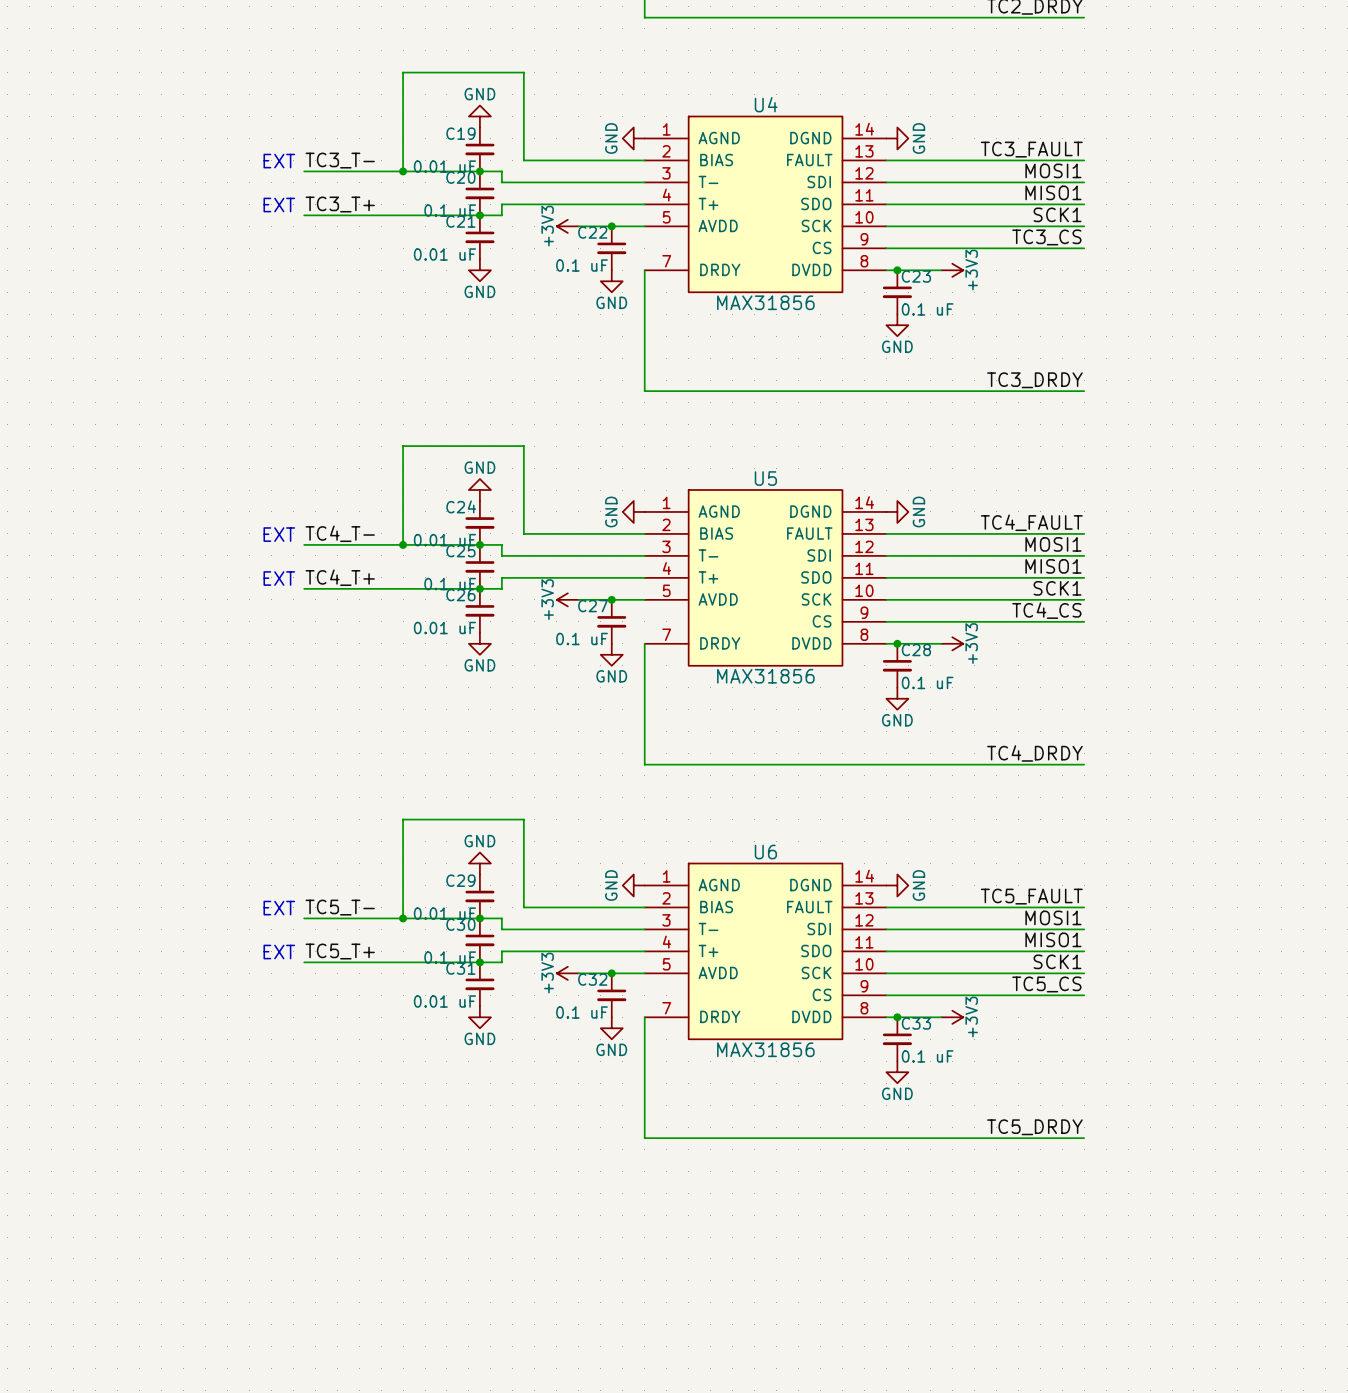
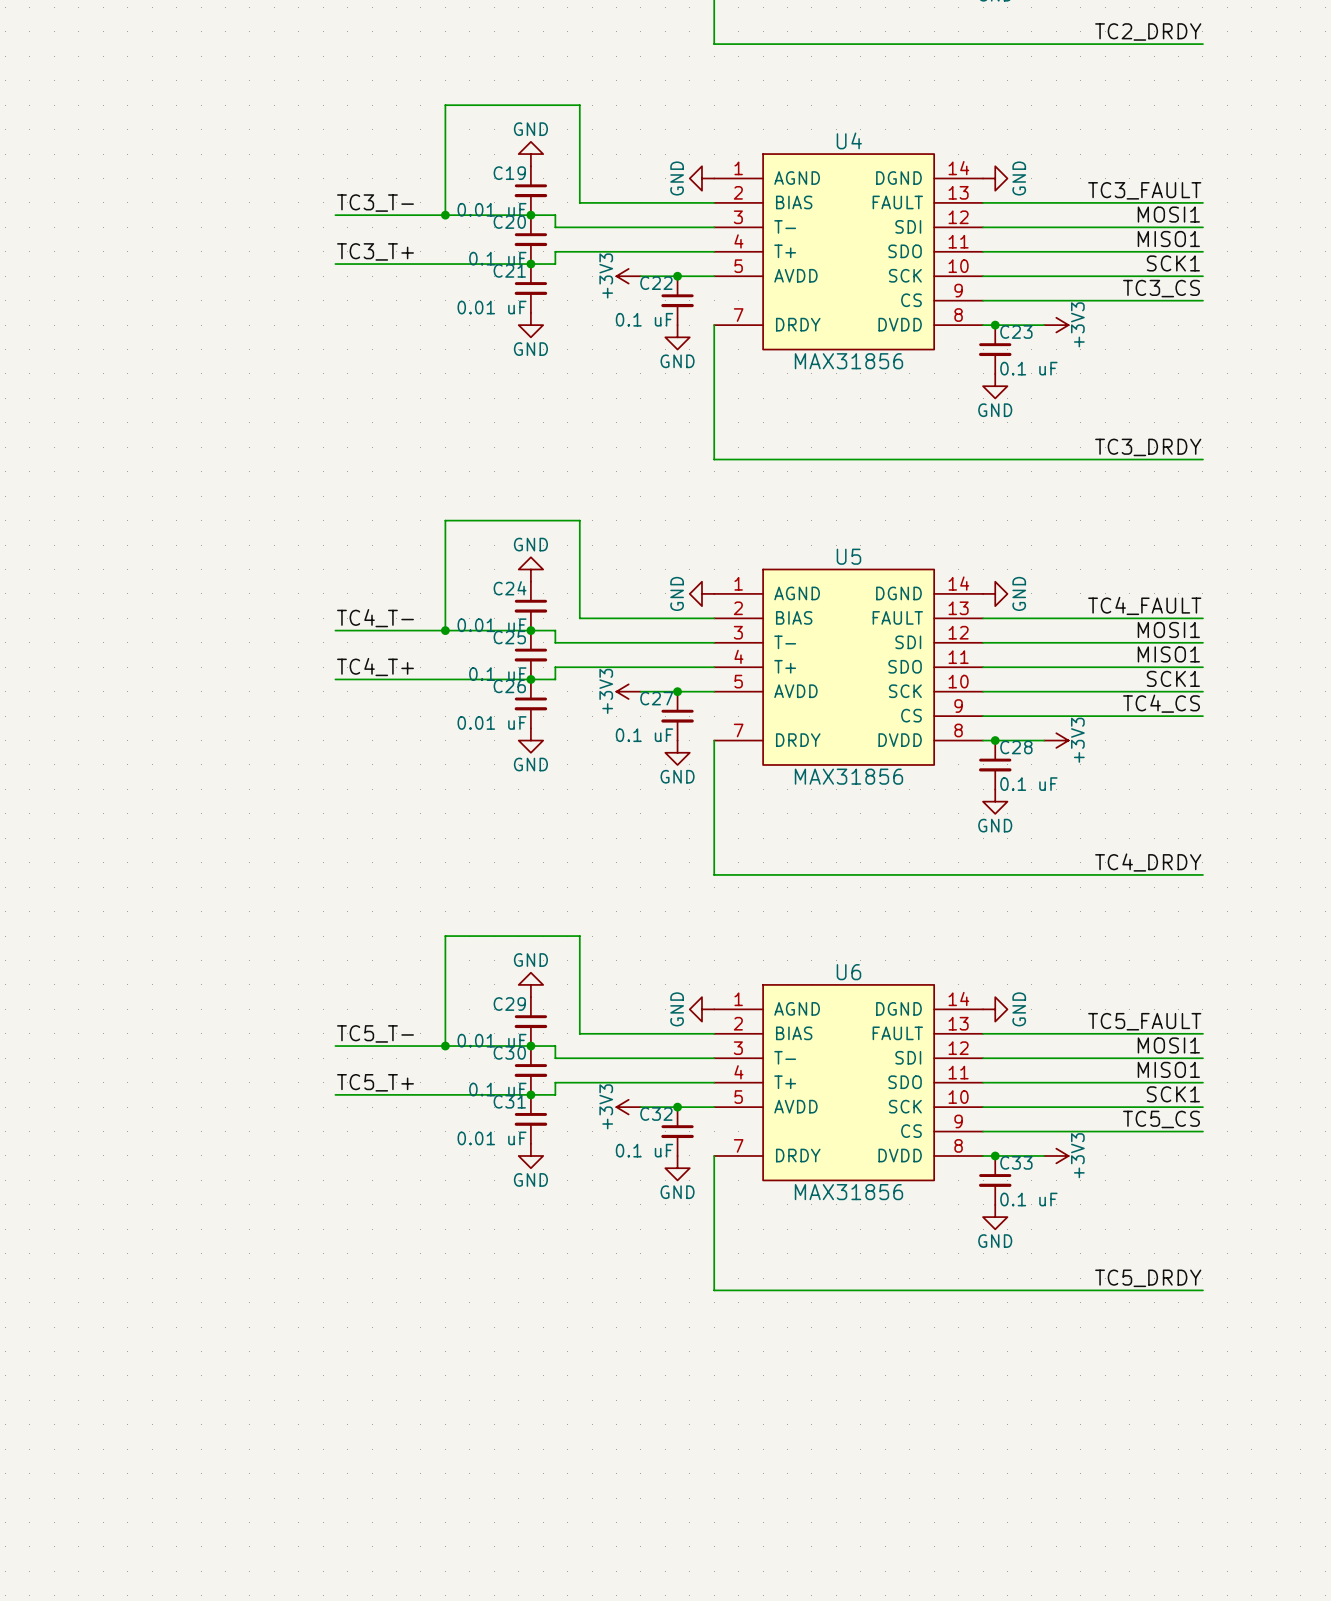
text: EXT (279, 161) -> none
text: EXT (279, 205) -> none
text: EXT (279, 534) -> none
text: EXT (279, 578) -> none
text: EXT (279, 908) -> none
text: EXT (279, 952) -> none

